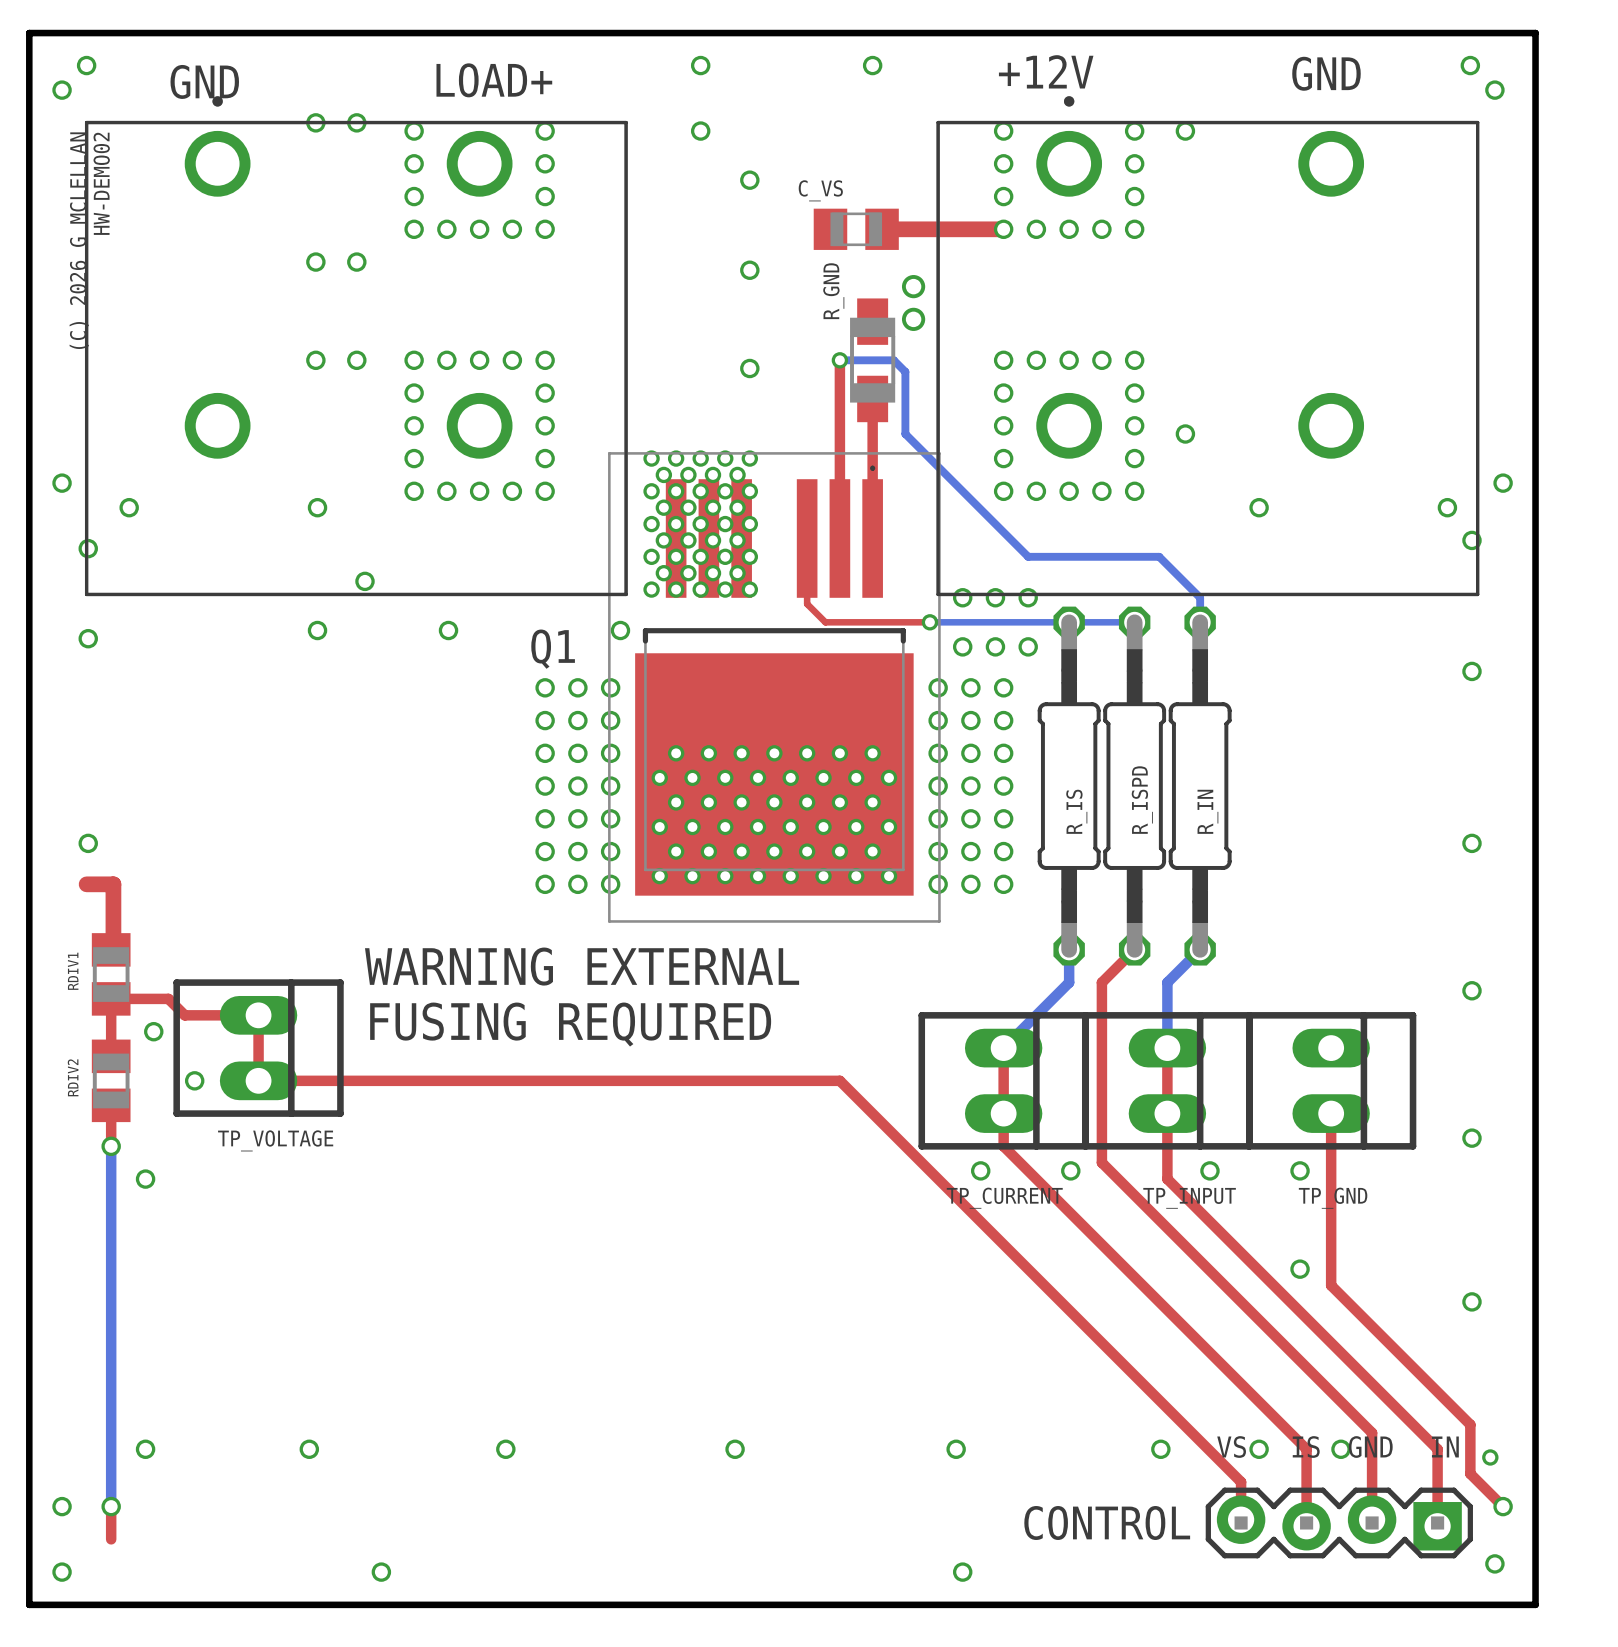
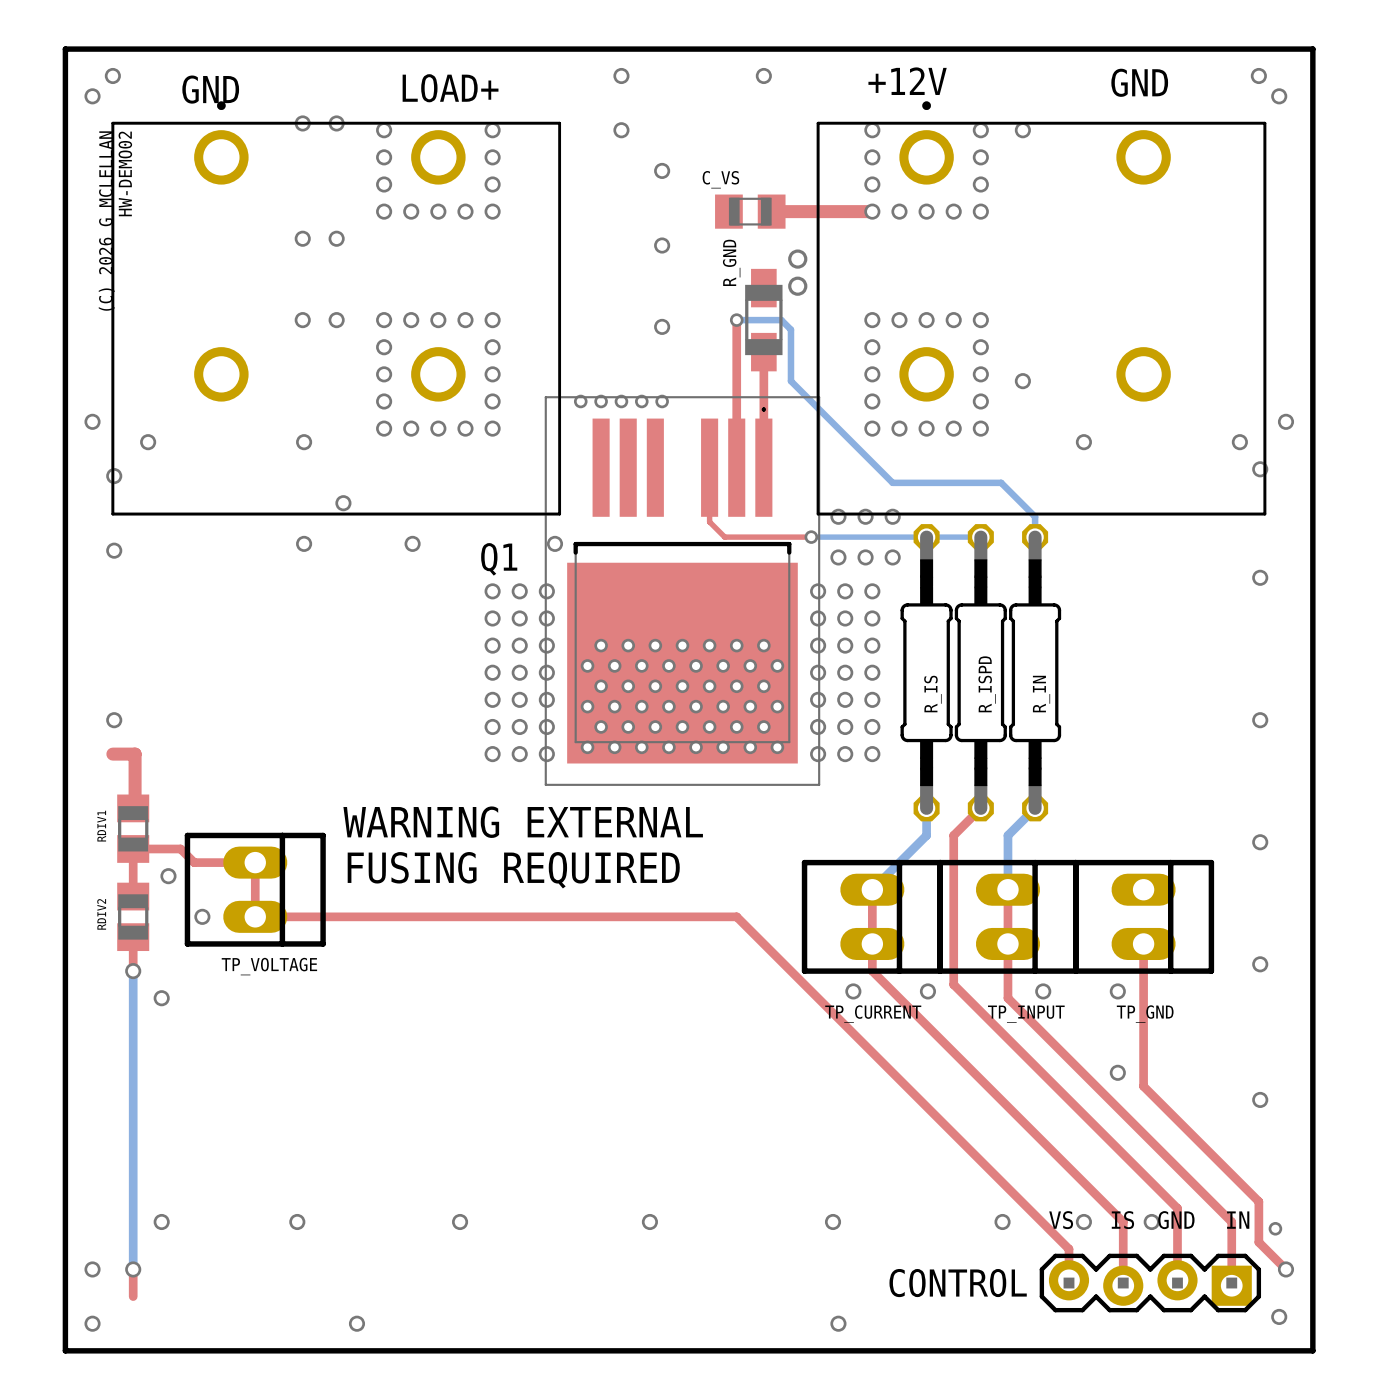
via: (663, 474) -> none
via: (688, 474) -> none
via: (712, 474) -> none
via: (737, 474) -> none
via: (651, 491) -> none
via: (676, 491) -> none
via: (700, 491) -> none
via: (725, 491) -> none
via: (749, 491) -> none
via: (663, 507) -> none
via: (688, 507) -> none
via: (712, 507) -> none
via: (737, 507) -> none
via: (651, 524) -> none
via: (676, 524) -> none
via: (700, 524) -> none
via: (725, 524) -> none
via: (749, 524) -> none
via: (663, 540) -> none
via: (688, 540) -> none
via: (712, 540) -> none
via: (737, 540) -> none
via: (651, 556) -> none
via: (676, 556) -> none
via: (700, 556) -> none
via: (725, 556) -> none
via: (749, 556) -> none
via: (663, 573) -> none
via: (688, 573) -> none
via: (712, 573) -> none
via: (737, 573) -> none
via: (651, 589) -> none
via: (676, 589) -> none
via: (700, 589) -> none
via: (725, 589) -> none
via: (749, 589) -> none

